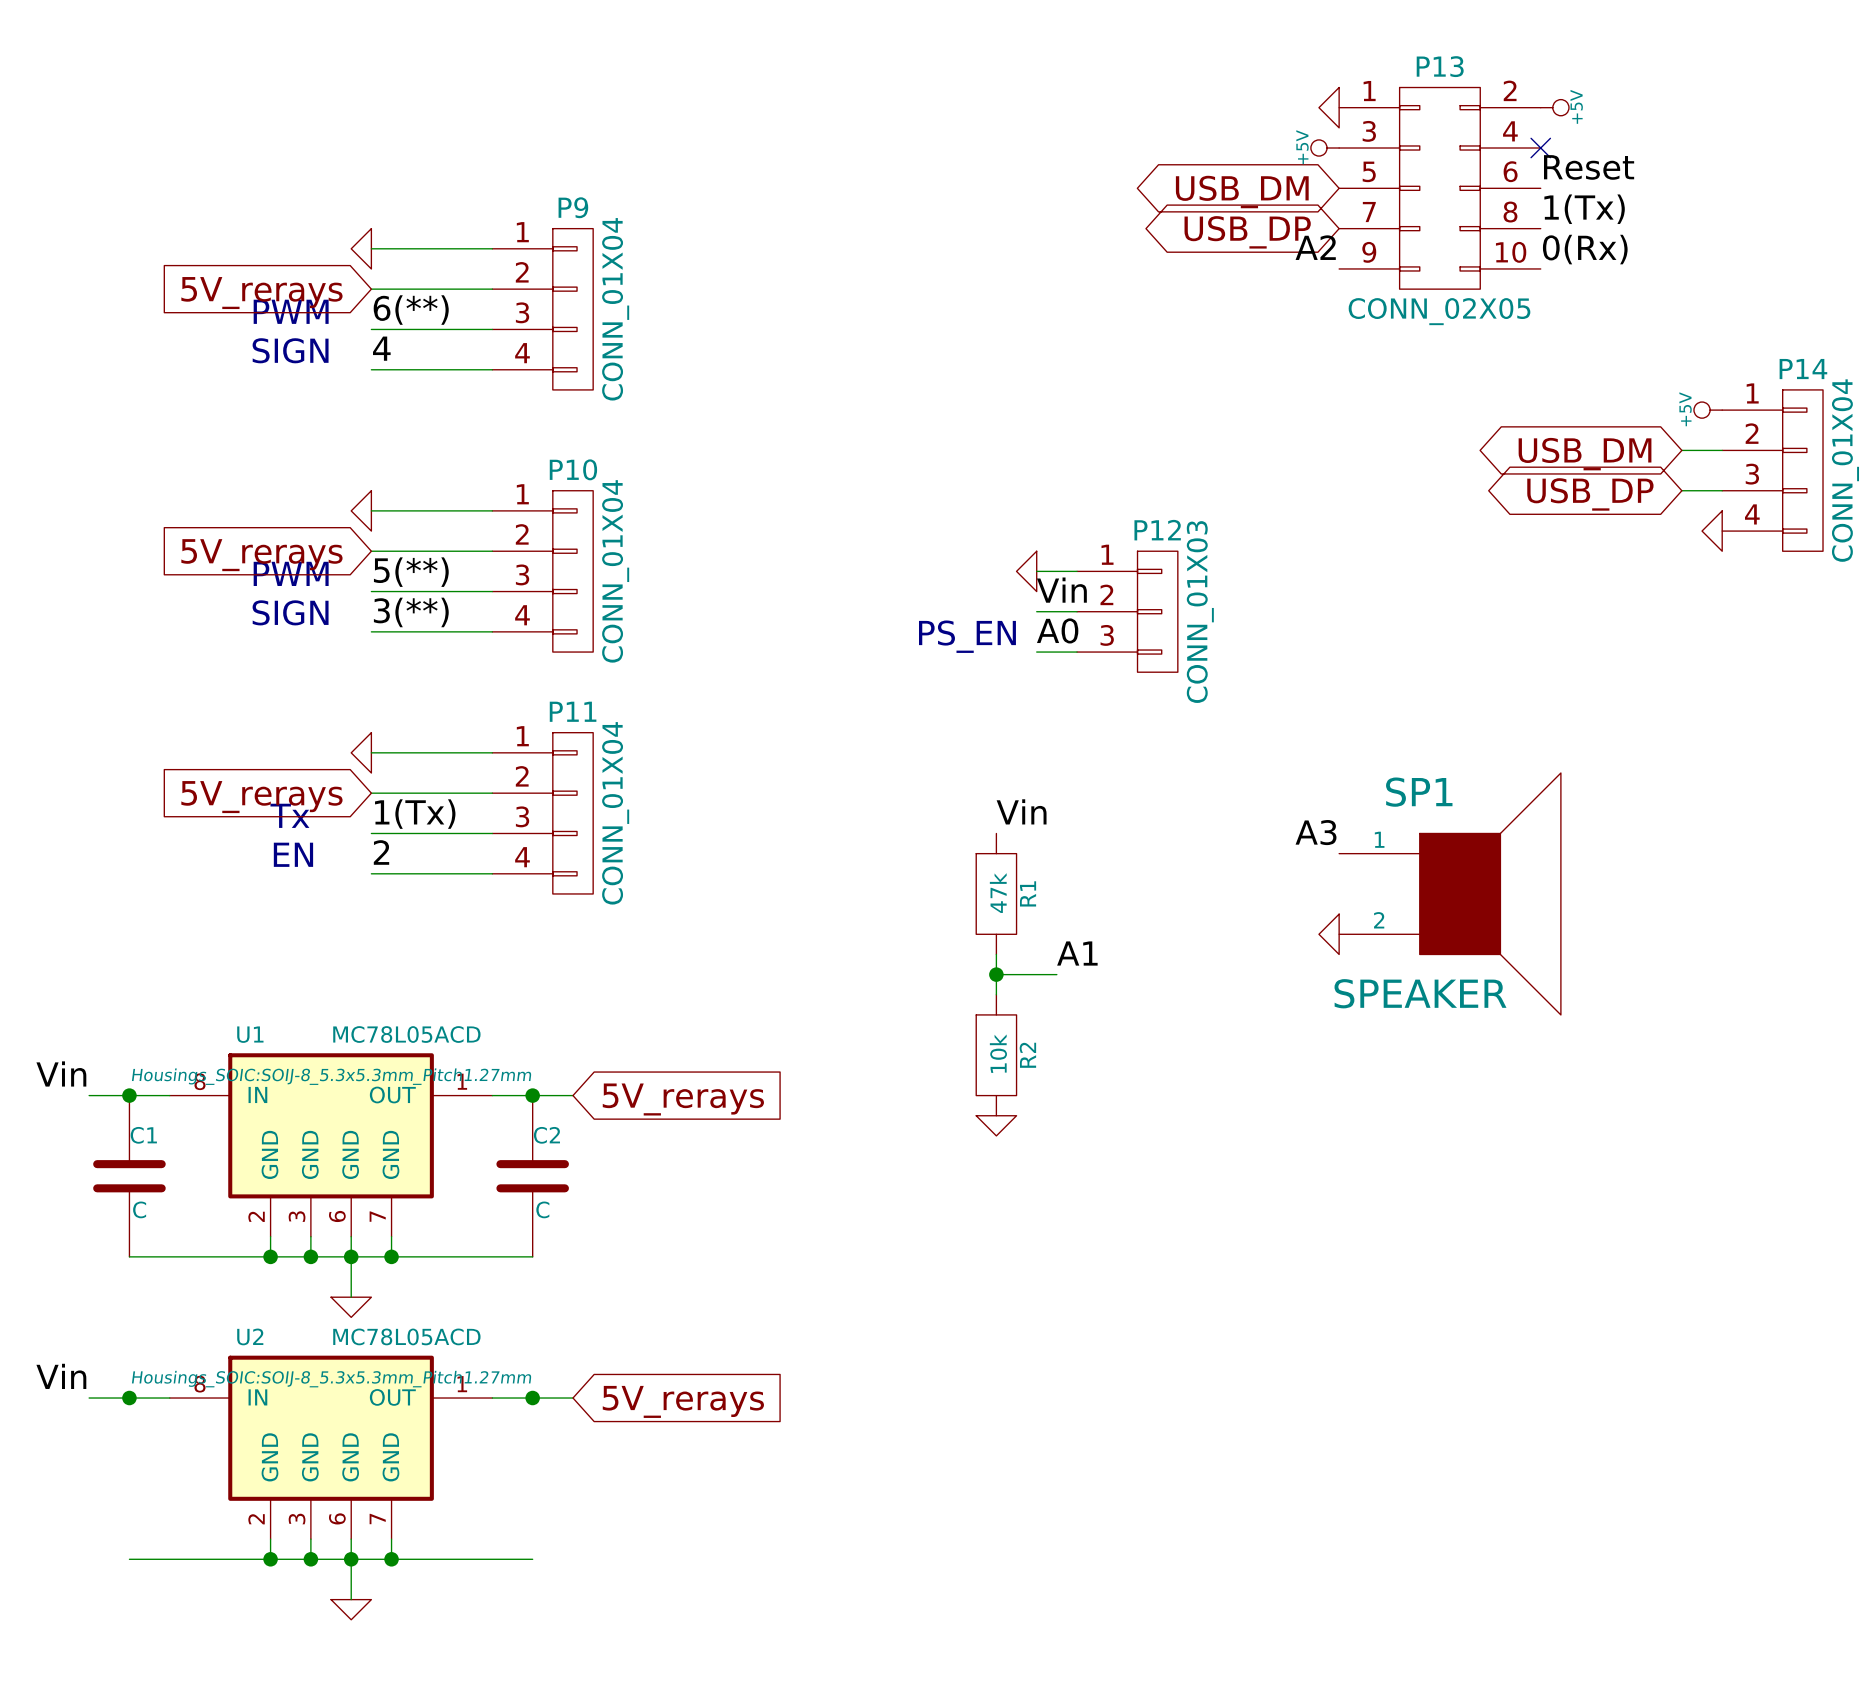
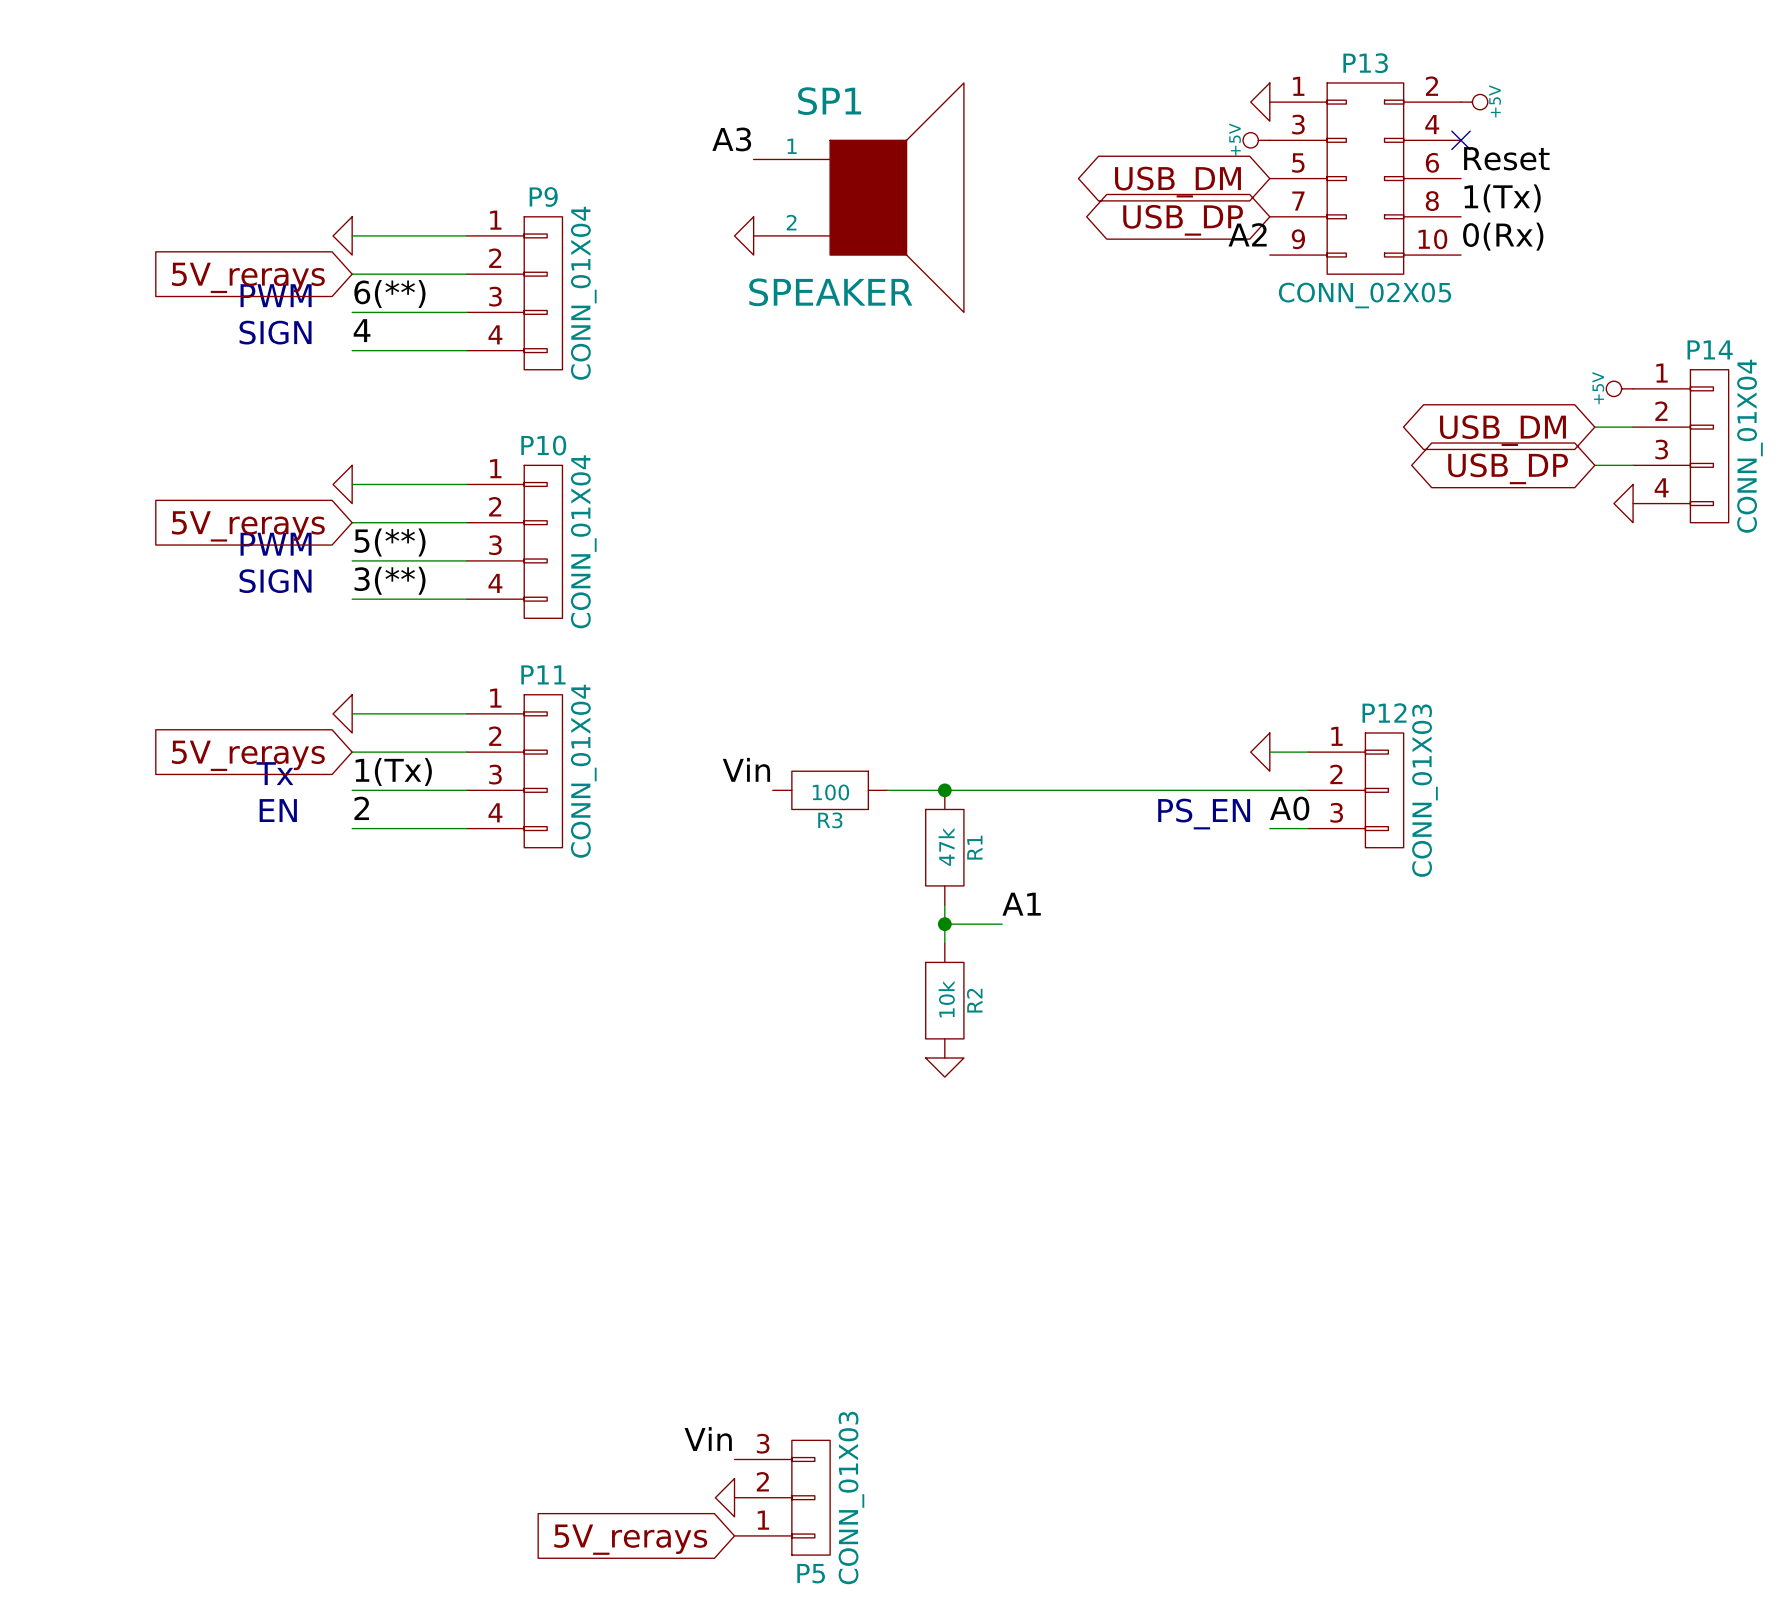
label: none -> A3 (731, 139)
power symbol: none -> (744, 235)
power symbol: (1026, 571) -> none
wire: (1036, 571) (1077, 571) -> (1269, 752) (1308, 752)
label: Vin (1061, 590) -> none
wire: (1036, 611) (1077, 611) -> none
P12 position: (1127, 611) -> (1355, 790)
label position: A0 (1057, 630) -> A0 (1289, 808)
text position: PS_EN (967, 636) -> PS_EN (1204, 814)
wire: (1036, 652) (1077, 652) -> (1269, 828) (1308, 828)
label: none -> Vin (746, 769)
label: Vin (1021, 811) -> none
label: A3 (1316, 832) -> none
R3: none -> 100 (830, 790)
wire: none -> (887, 790) (1308, 790)
junction: none -> (944, 790)
SP1 position: (1450, 893) -> (858, 197)
power symbol position: (1329, 934) -> (1260, 752)
label: Vin (61, 1073) -> none
wire: (89, 1095) (169, 1095) -> none
junction: (129, 1095) -> none
wire: (492, 1095) (572, 1095) -> none
junction: (532, 1095) -> none
global label: 5V_rerays (683, 1099) -> none
U1: MC78L05ACD (331, 1144) -> none
C1: C (129, 1176) -> none
C2: C (532, 1176) -> none
wire: (270, 1236) (270, 1256) -> none
wire: (310, 1236) (310, 1256) -> none
wire: (351, 1236) (351, 1297) -> none
wire: (391, 1236) (391, 1256) -> none
wire: (129, 1256) (532, 1256) -> none
junction: (270, 1256) -> none
junction: (310, 1256) -> none
junction: (351, 1256) -> none
junction: (391, 1256) -> none
power symbol: (351, 1307) -> none
label: Vin (61, 1376) -> none
wire: (89, 1398) (169, 1398) -> none
junction: (129, 1398) -> none
wire: (492, 1398) (572, 1398) -> none
junction: (532, 1398) -> none
global label: 5V_rerays (683, 1401) -> none
U2: MC78L05ACD (331, 1447) -> none
label: none -> Vin (708, 1438)
wire: (270, 1539) (270, 1559) -> none
wire: (310, 1539) (310, 1559) -> none
wire: (351, 1539) (351, 1599) -> none
wire: (391, 1539) (391, 1559) -> none
wire: (129, 1559) (532, 1559) -> none
junction: (270, 1559) -> none
junction: (310, 1559) -> none
junction: (351, 1559) -> none
junction: (391, 1559) -> none
power symbol: none -> (724, 1497)
P5: none -> CONN_01X03 (782, 1497)
power symbol: (351, 1609) -> none
global label: none -> 5V_rerays (630, 1539)

